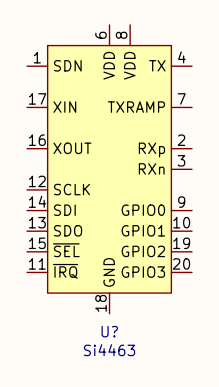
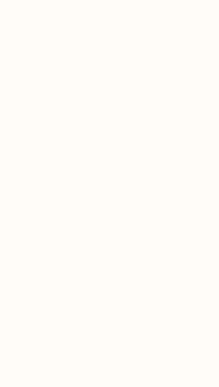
U?: Si4463 (109, 169) -> none

